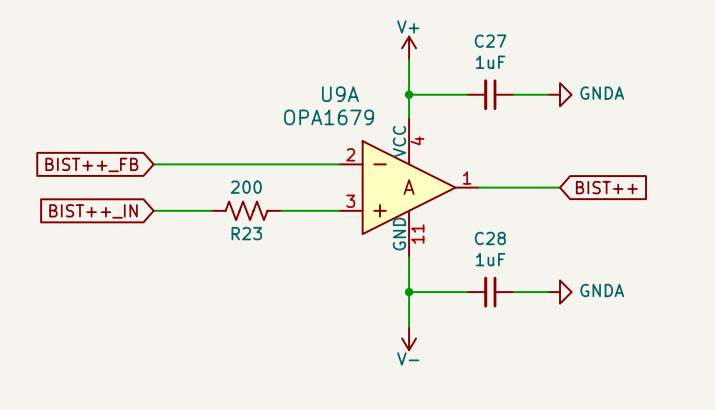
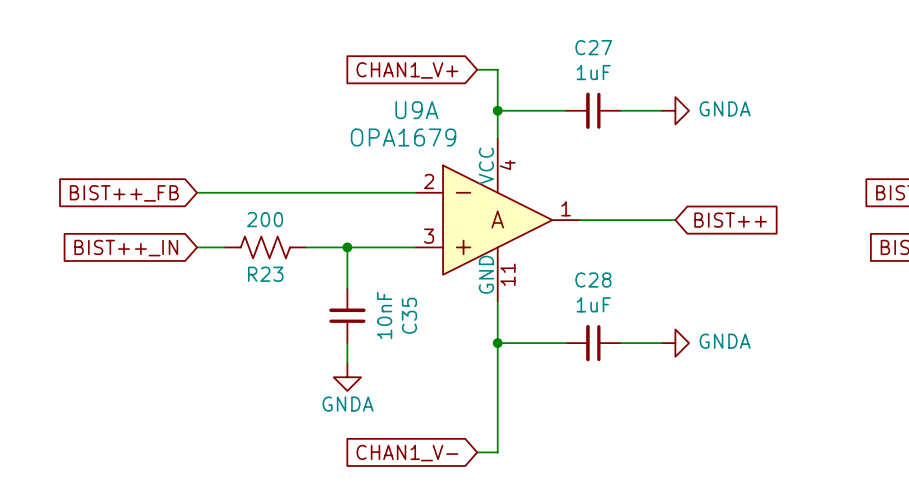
power symbol: V+ (409, 48) -> none
wire: none -> (477, 69) (497, 69)
global label: none -> CHAN1_V+ (407, 70)
wire: none -> (306, 247) (347, 247) (347, 288)
R23 position: (246, 210) -> (265, 247)
junction: none -> (347, 247)
C35: none -> 10nF (347, 315)
wire: none -> (347, 343) (347, 363)
power symbol: none -> GNDA (347, 377)
wire: none -> (497, 384) (497, 452) (477, 452)
power symbol: V- (409, 338) -> none
global label: none -> CHAN1_V- (407, 453)

